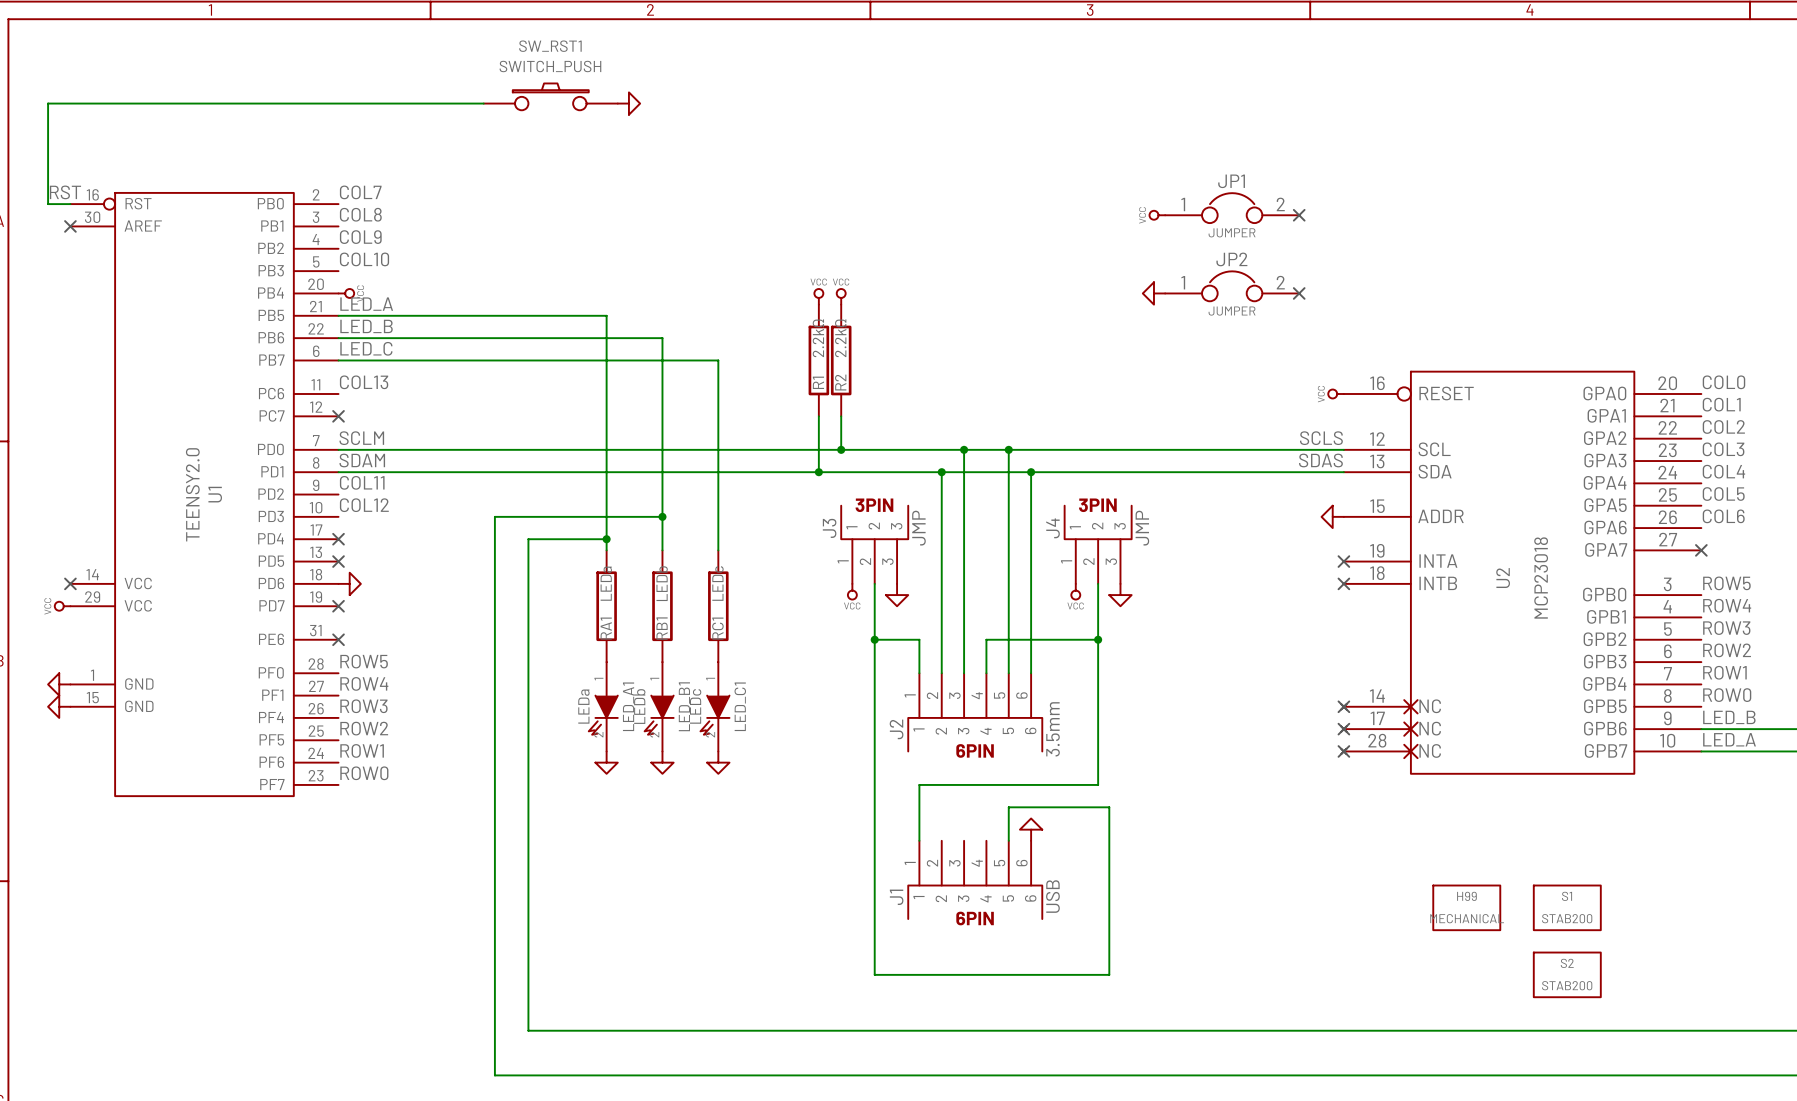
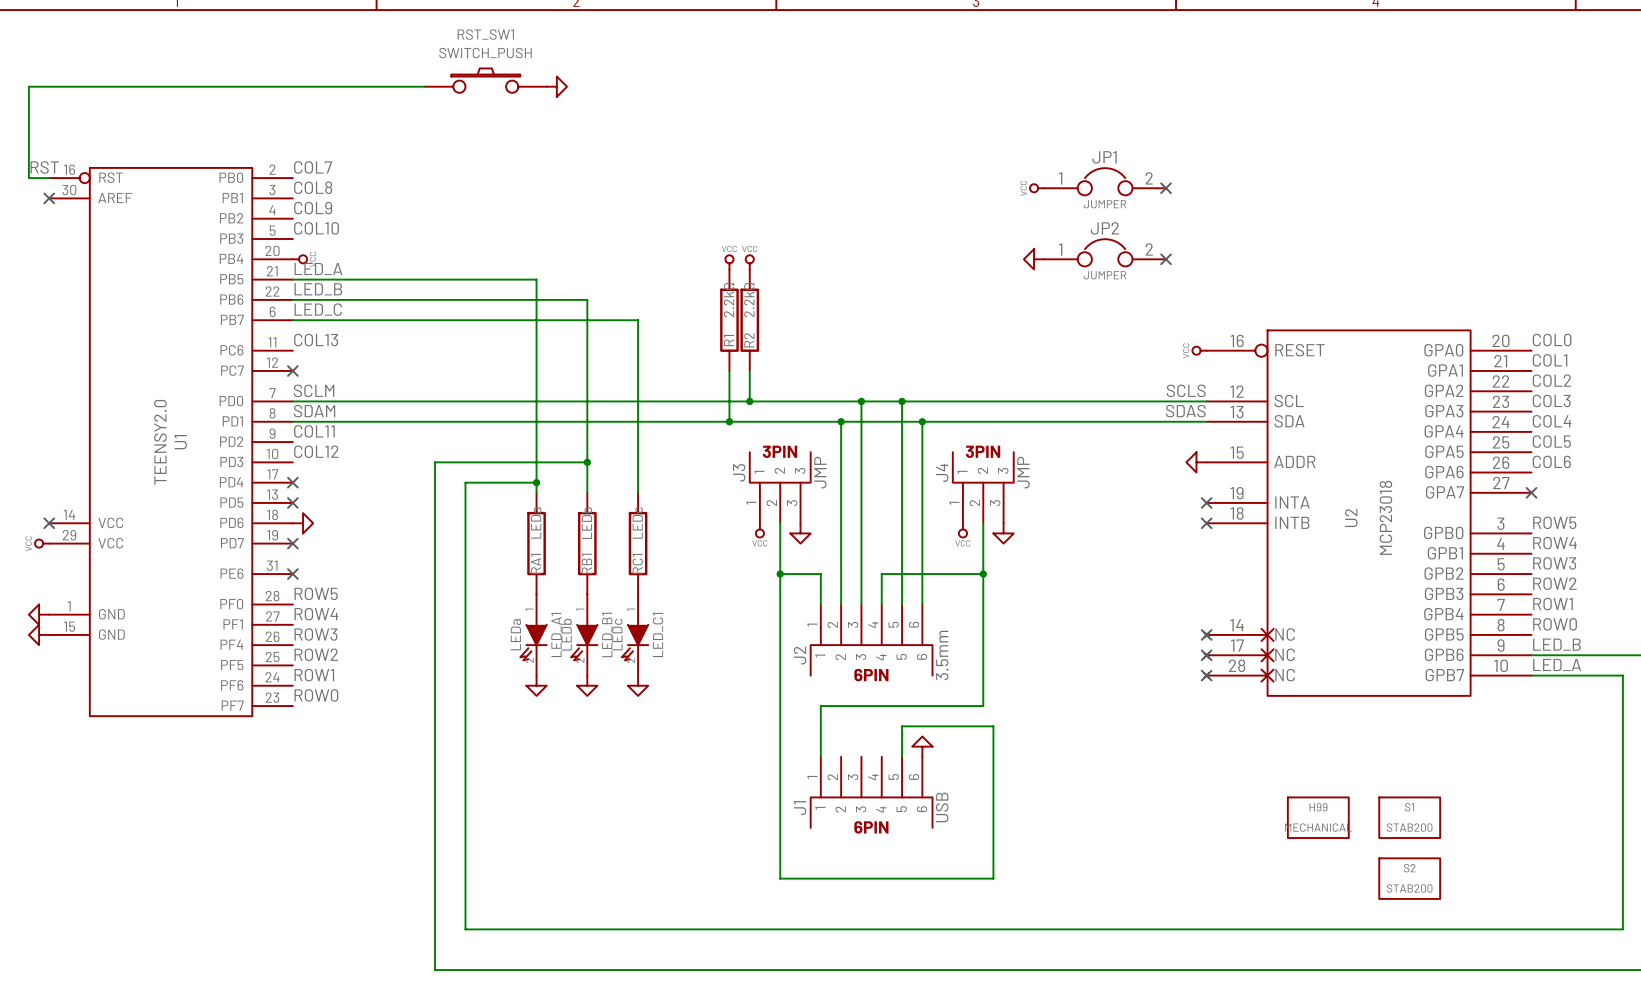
SW_RST1 name: SW_RST1 (550, 46) -> RST_SW1 (485, 34)

